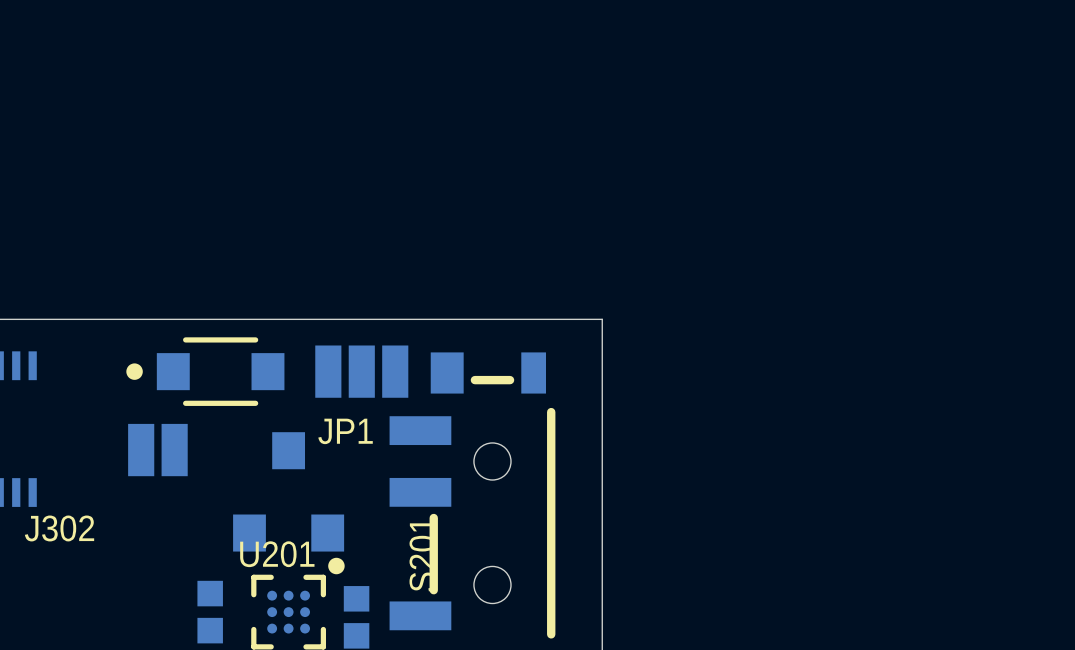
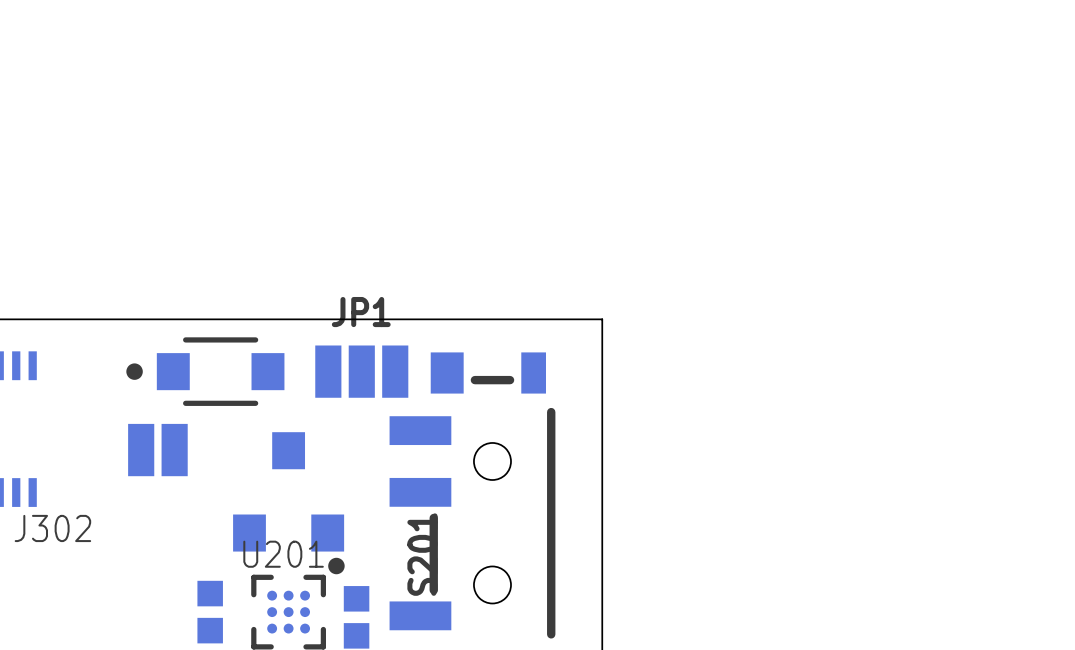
JP1 name position: JP1 (345, 431) -> JP1 (361, 312)

